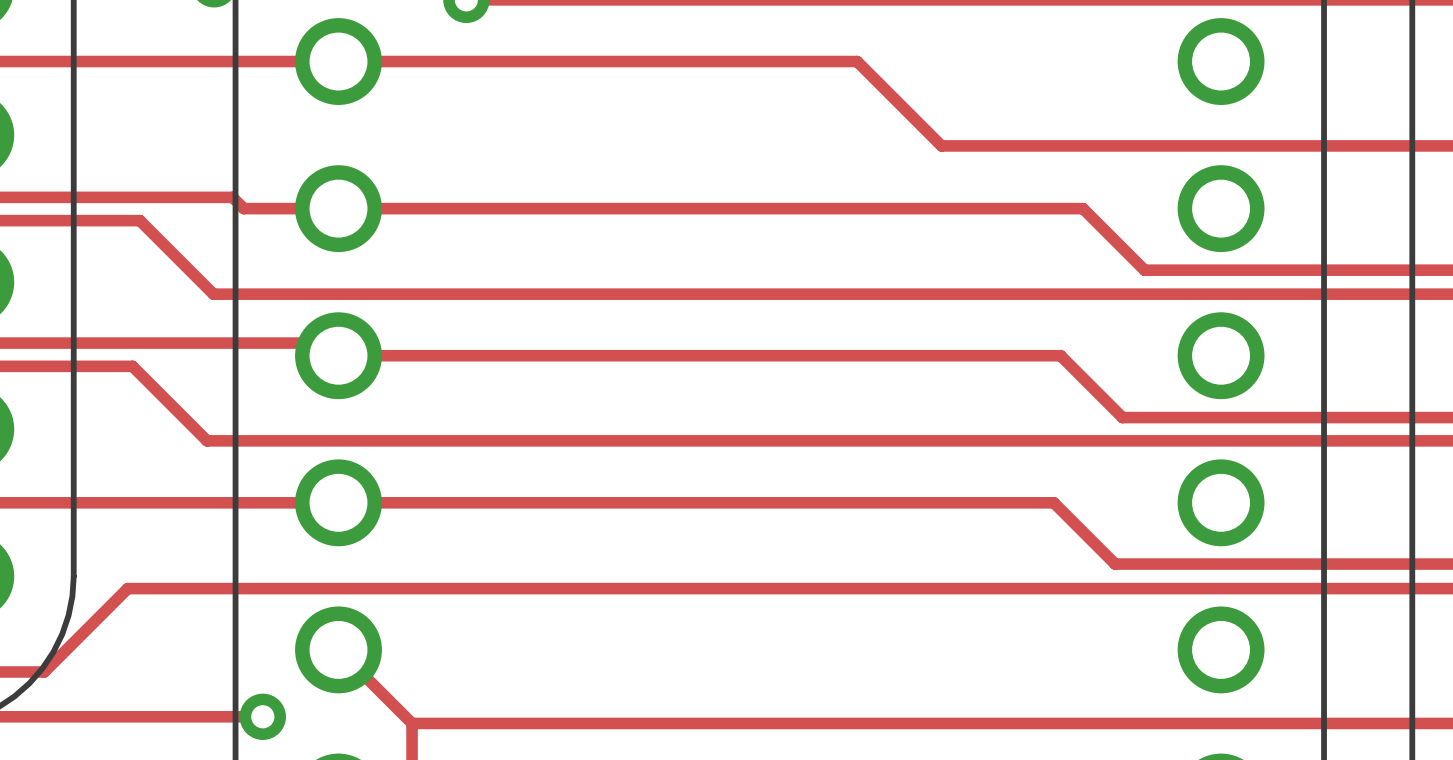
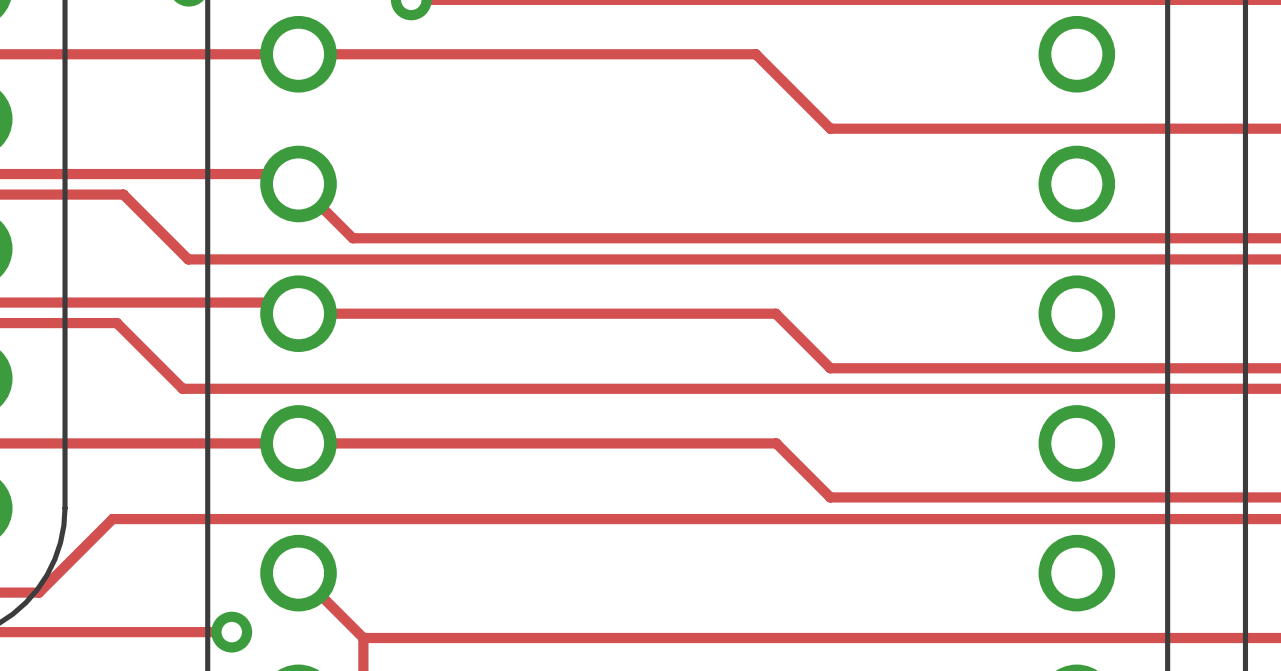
track: (232, 197) (243, 208) (1083, 208) (1144, 270) -> (298, 183) (352, 238) (1009, 238)
track: none -> (205, 174) (288, 174)
track: (879, 355) (1060, 355) (1122, 417) -> (775, 313) (830, 368) (989, 368)
track: (880, 502) (1053, 502) (1115, 564) -> (776, 443) (830, 497) (983, 497)

